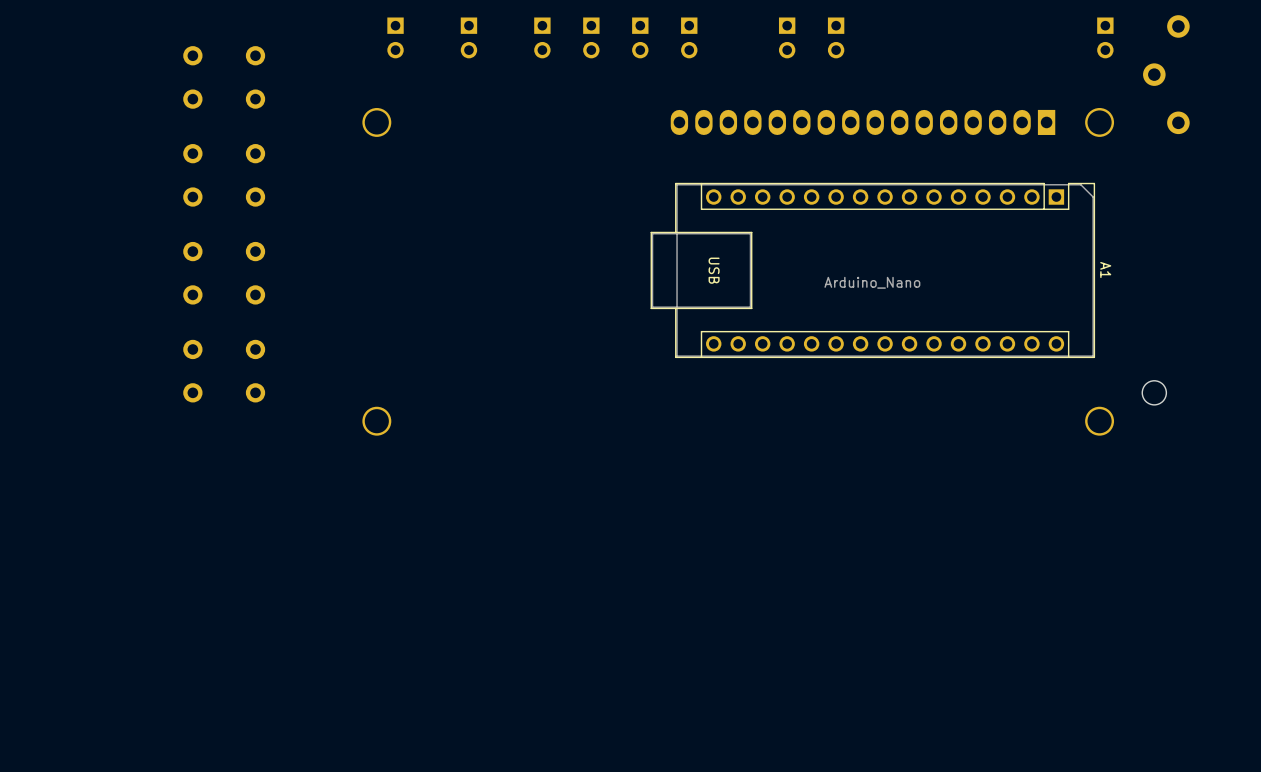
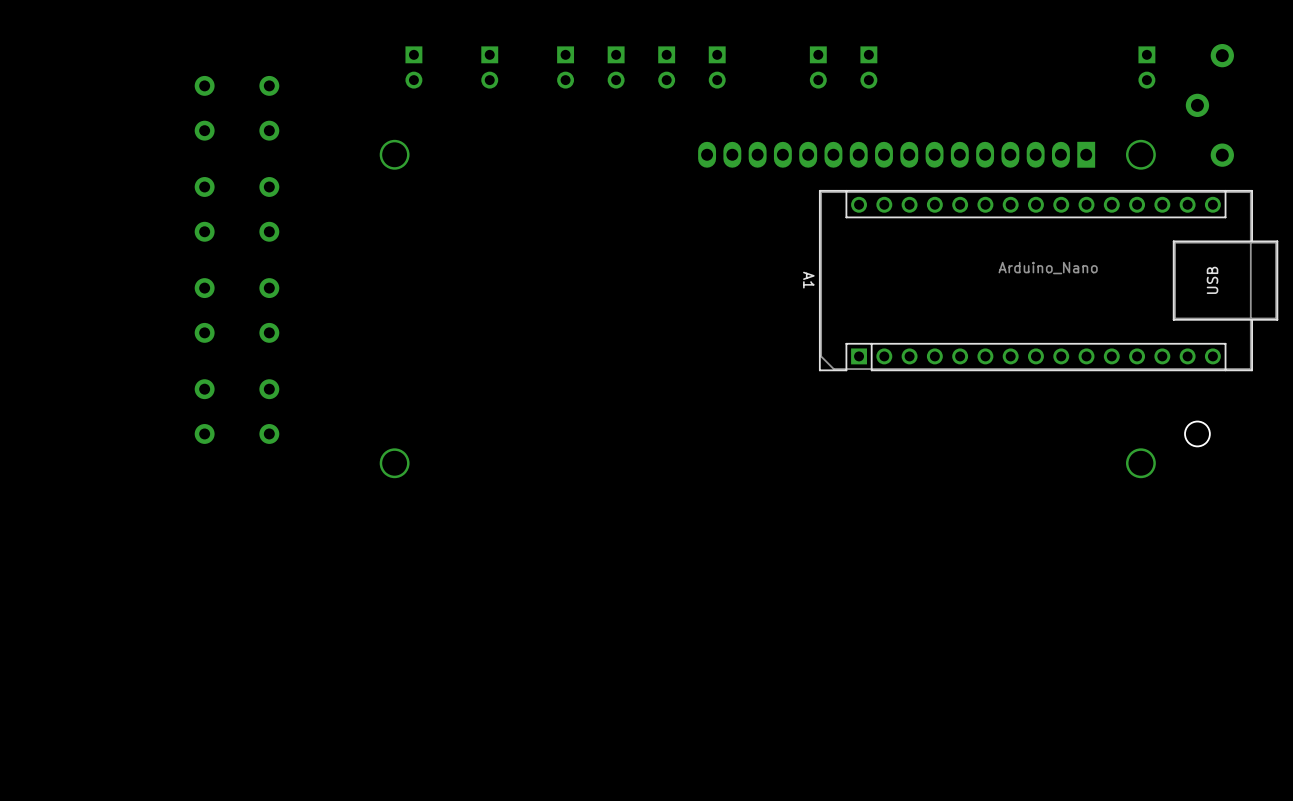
A1 rotation: 0° (872, 270) -> 180° (1048, 280)

